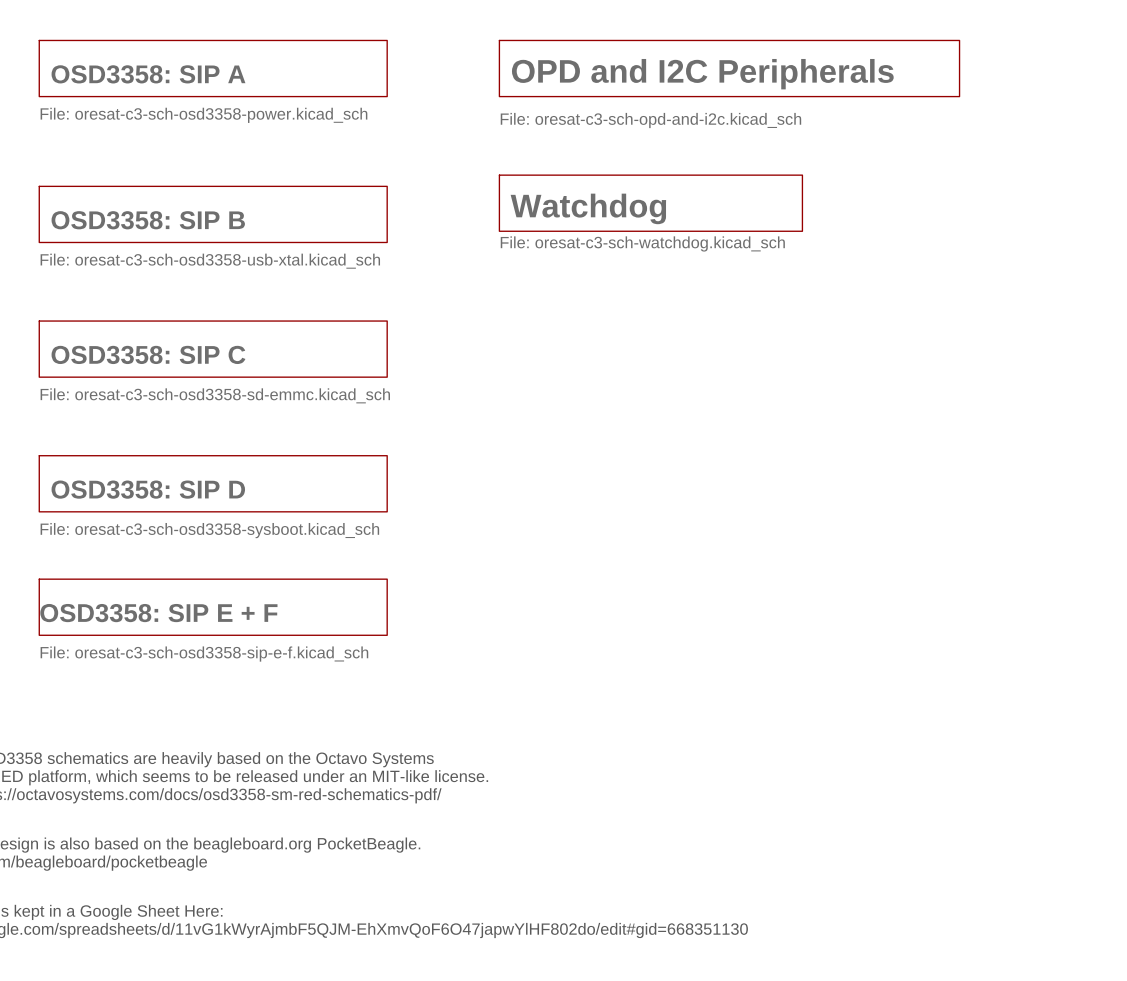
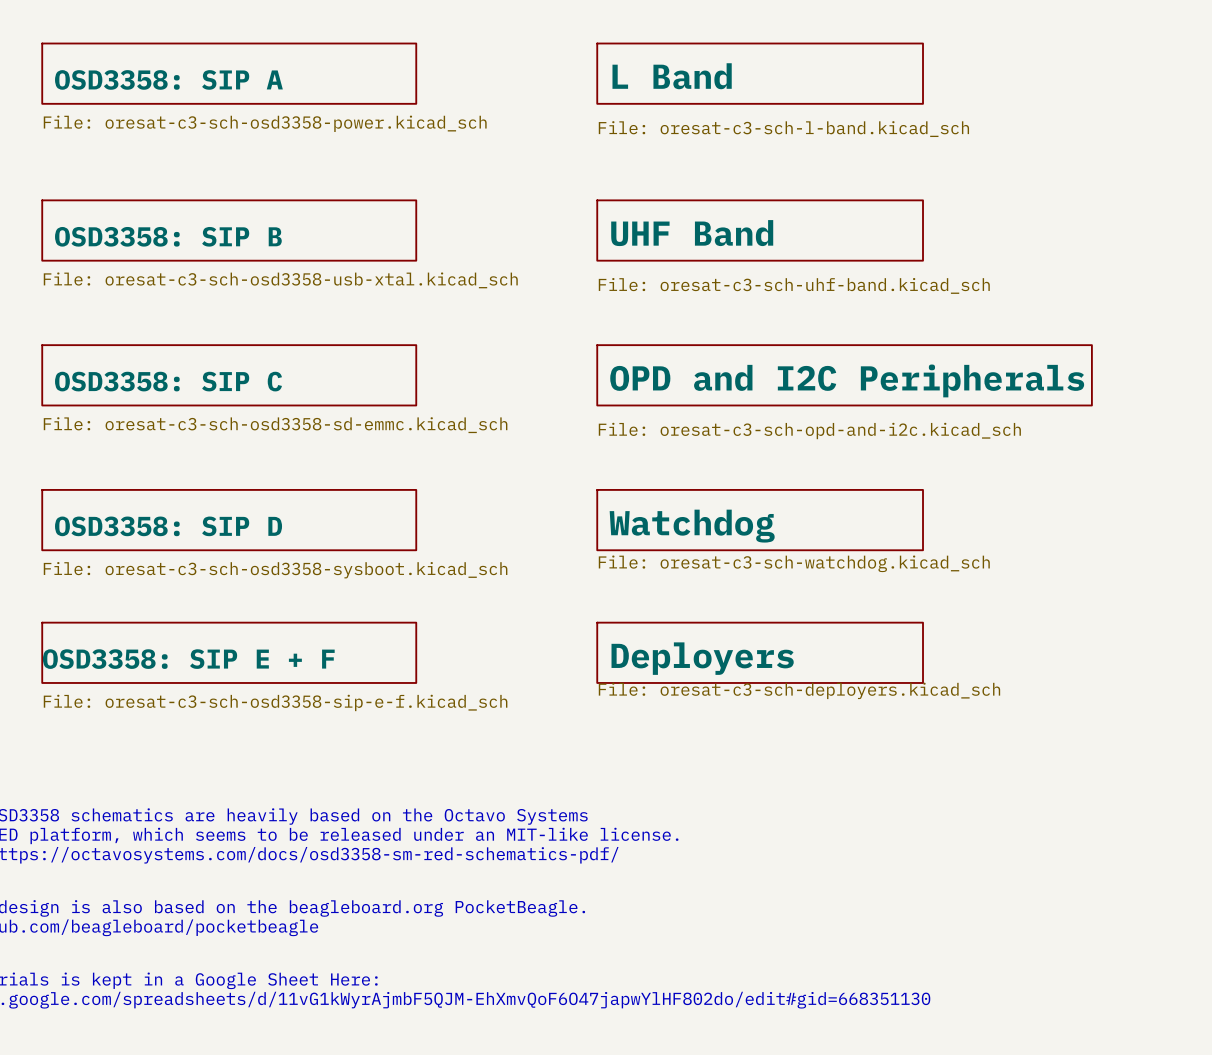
sheet L Band: none -> File: oresat-c3-sch-l-band.kicad_sch (760, 73)
sheet OPD and I2C Peripherals position: (729, 68) -> (844, 375)
sheet Watchdog: File: oresat-c3-sch-watchdog.kicad_sch (650, 203) -> none
sheet UHF Band: none -> File: oresat-c3-sch-uhf-band.kicad_sch (760, 230)
sheet Watchdog: none -> File: oresat-c3-sch-watchdog.kicad_sch (760, 520)
sheet Deployers: none -> File: oresat-c3-sch-deployers.kicad_sch (760, 652)

